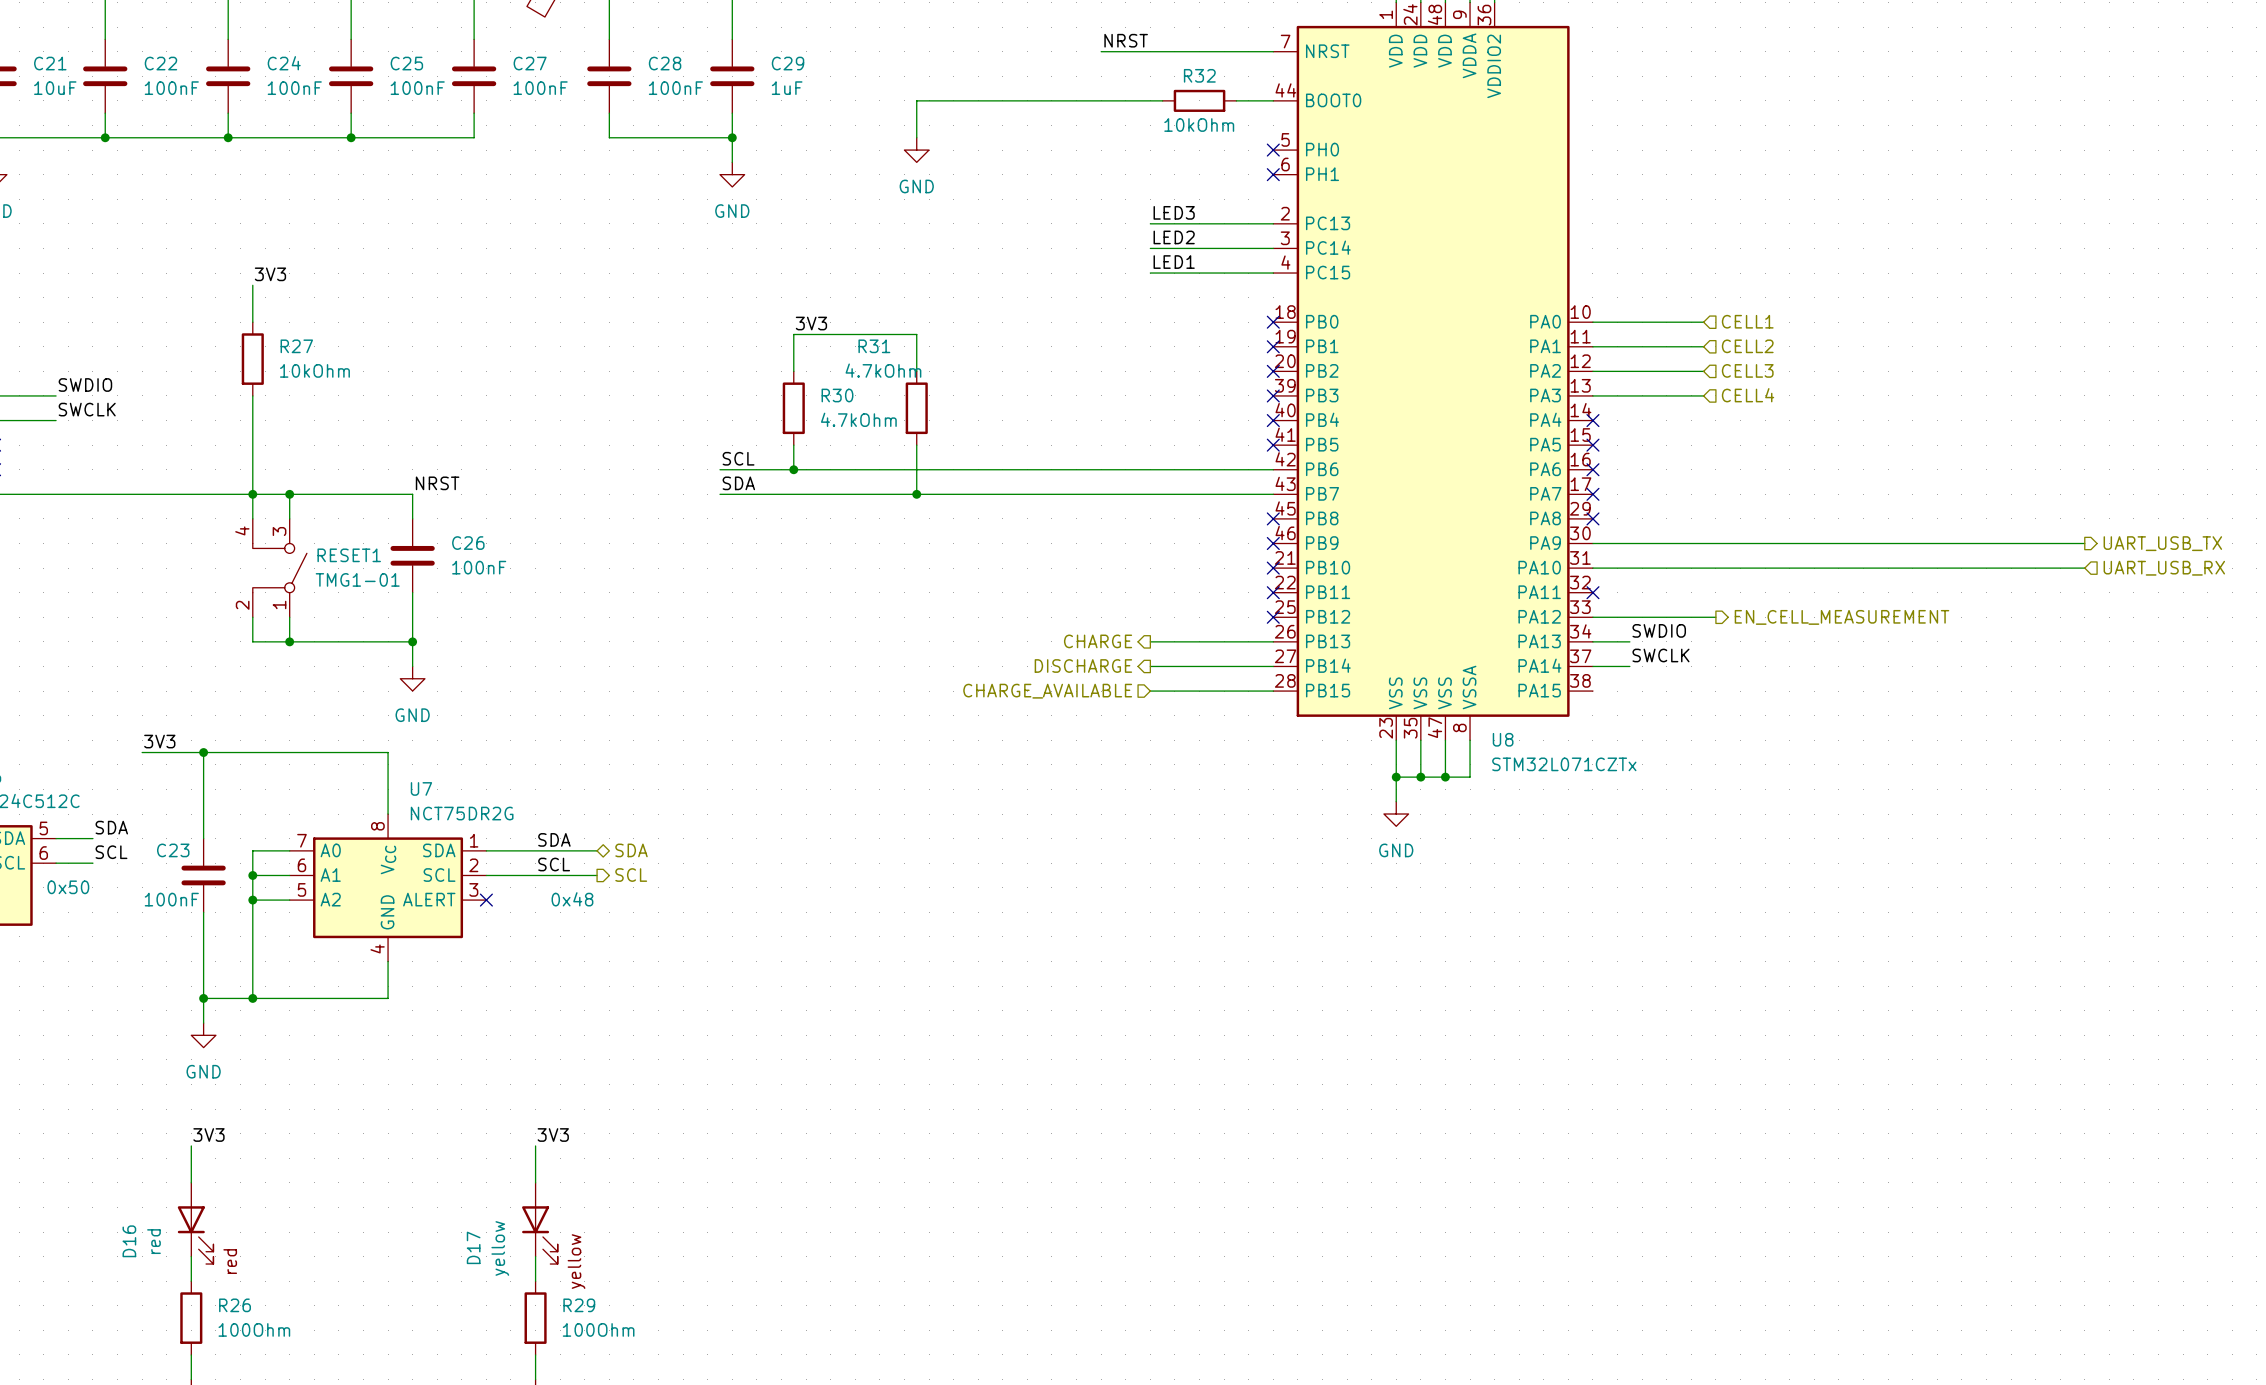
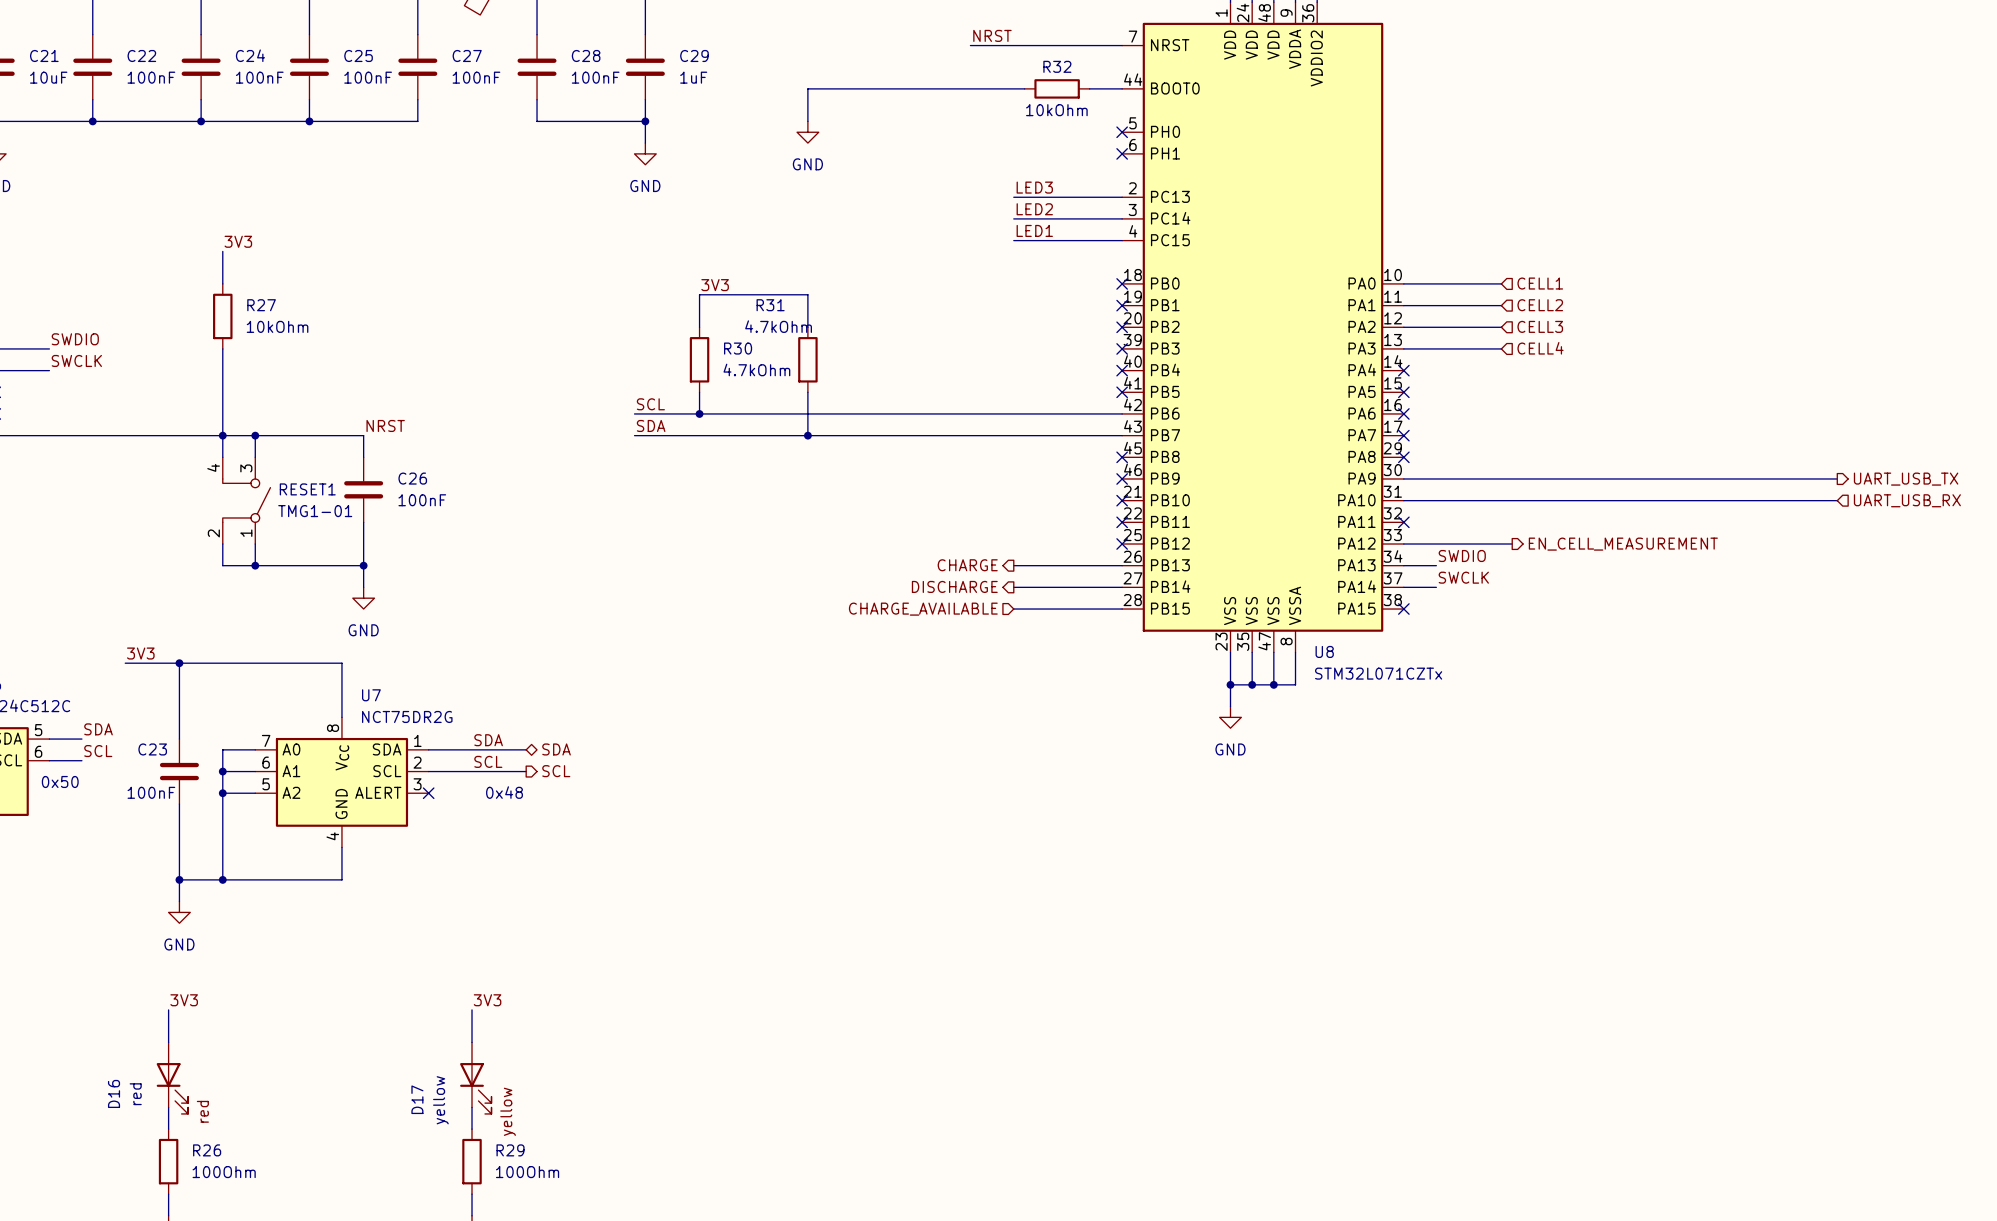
no-connect mark: none -> (1403, 609)

